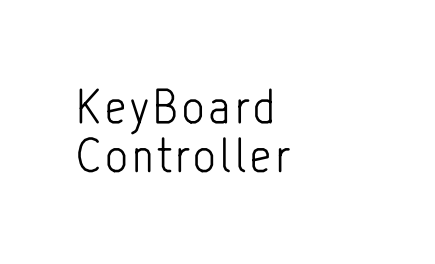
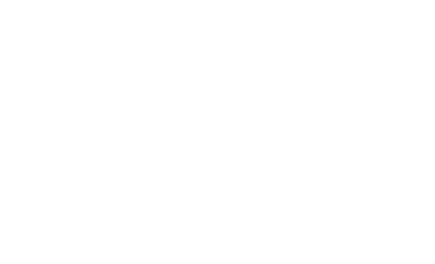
text: KeyBoard (175, 111) -> none
text: Controller (184, 154) -> none

